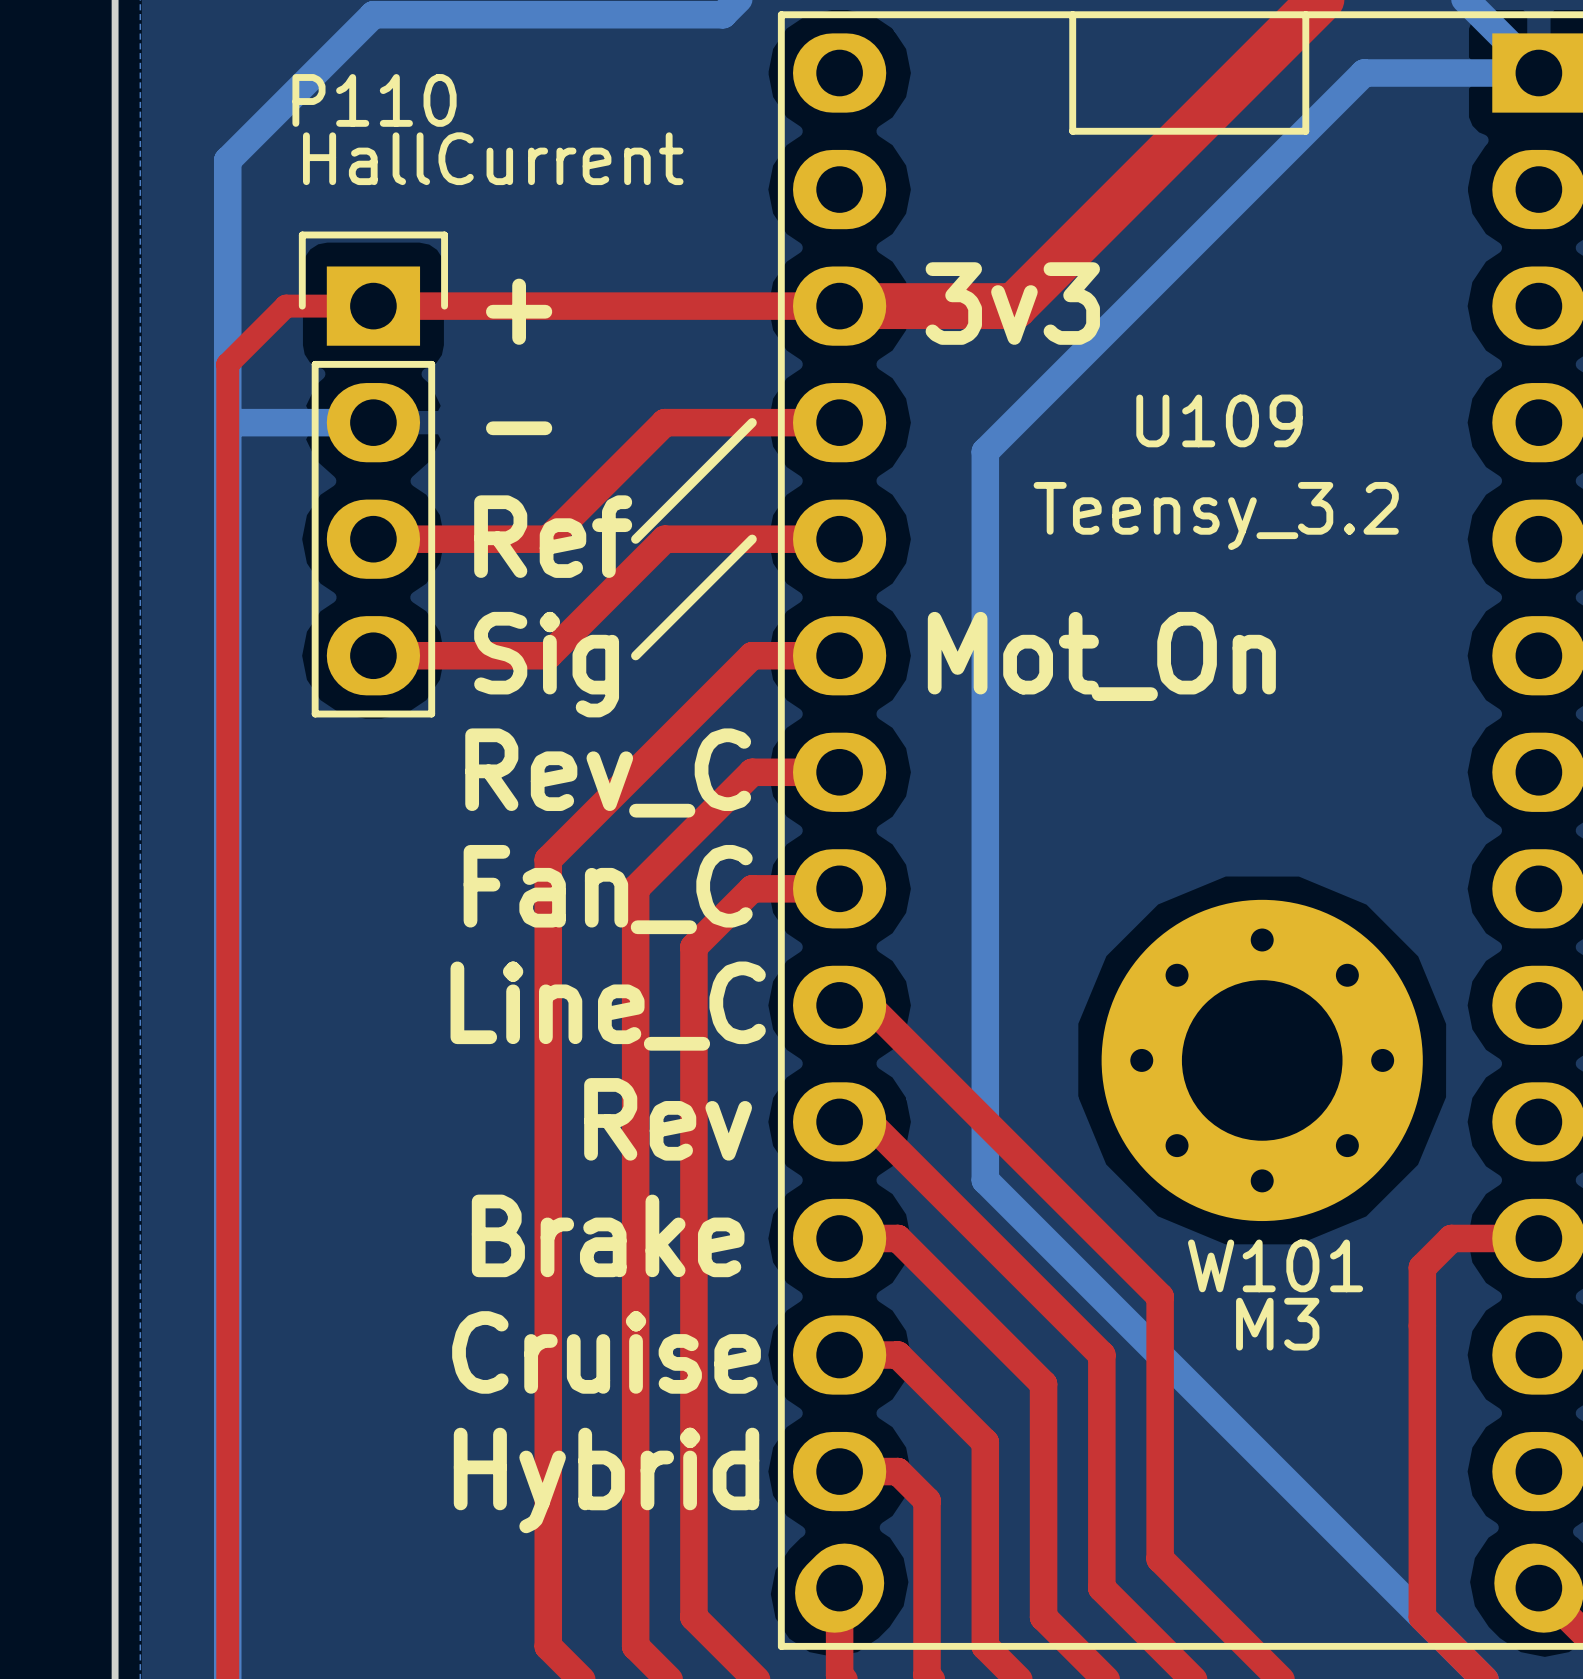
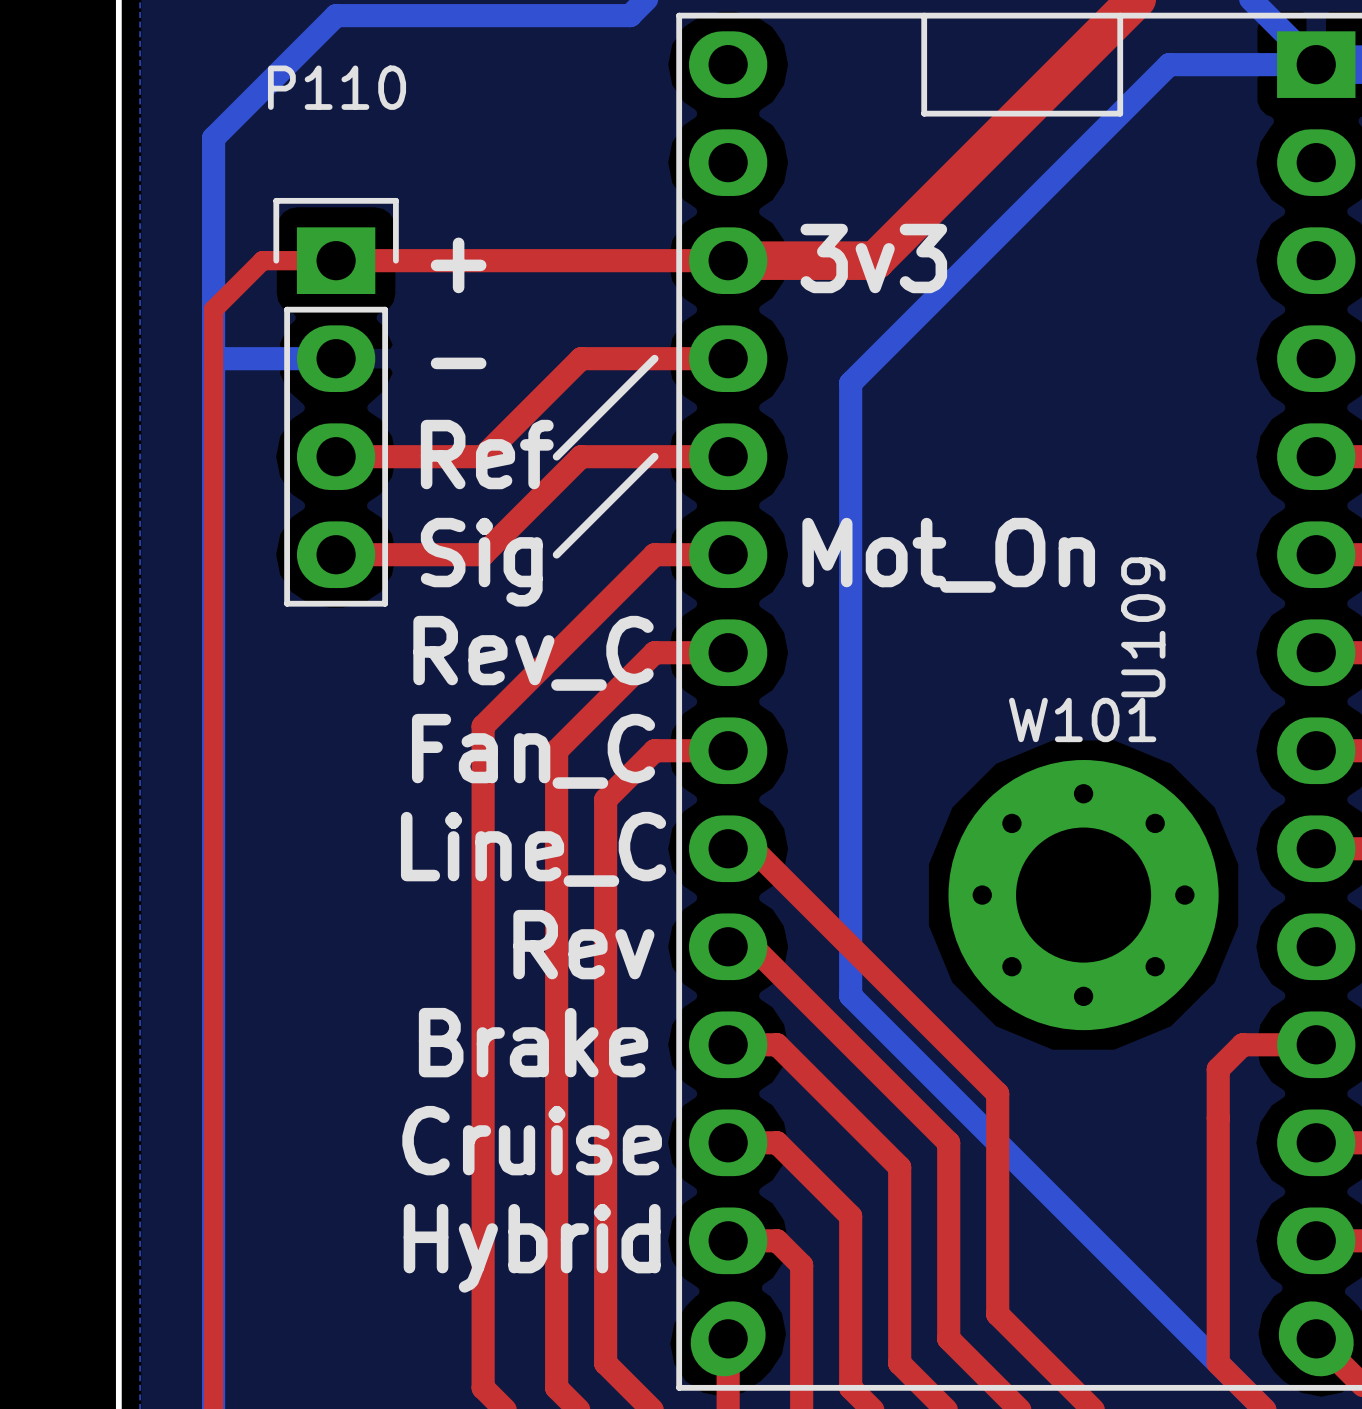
P110 value: HallCurrent (493, 158) -> none
U109 name rotation: 0° (1219, 420) -> 90° counterclockwise (1143, 627)
U109 name position: U109 (1219, 420) -> U109 (1143, 627)
U109 value: Teensy_3.2 (1216, 515) -> none
W101 name position: W101 (1275, 1265) -> W101 (1082, 719)
W101 value: M3 (1277, 1324) -> none

